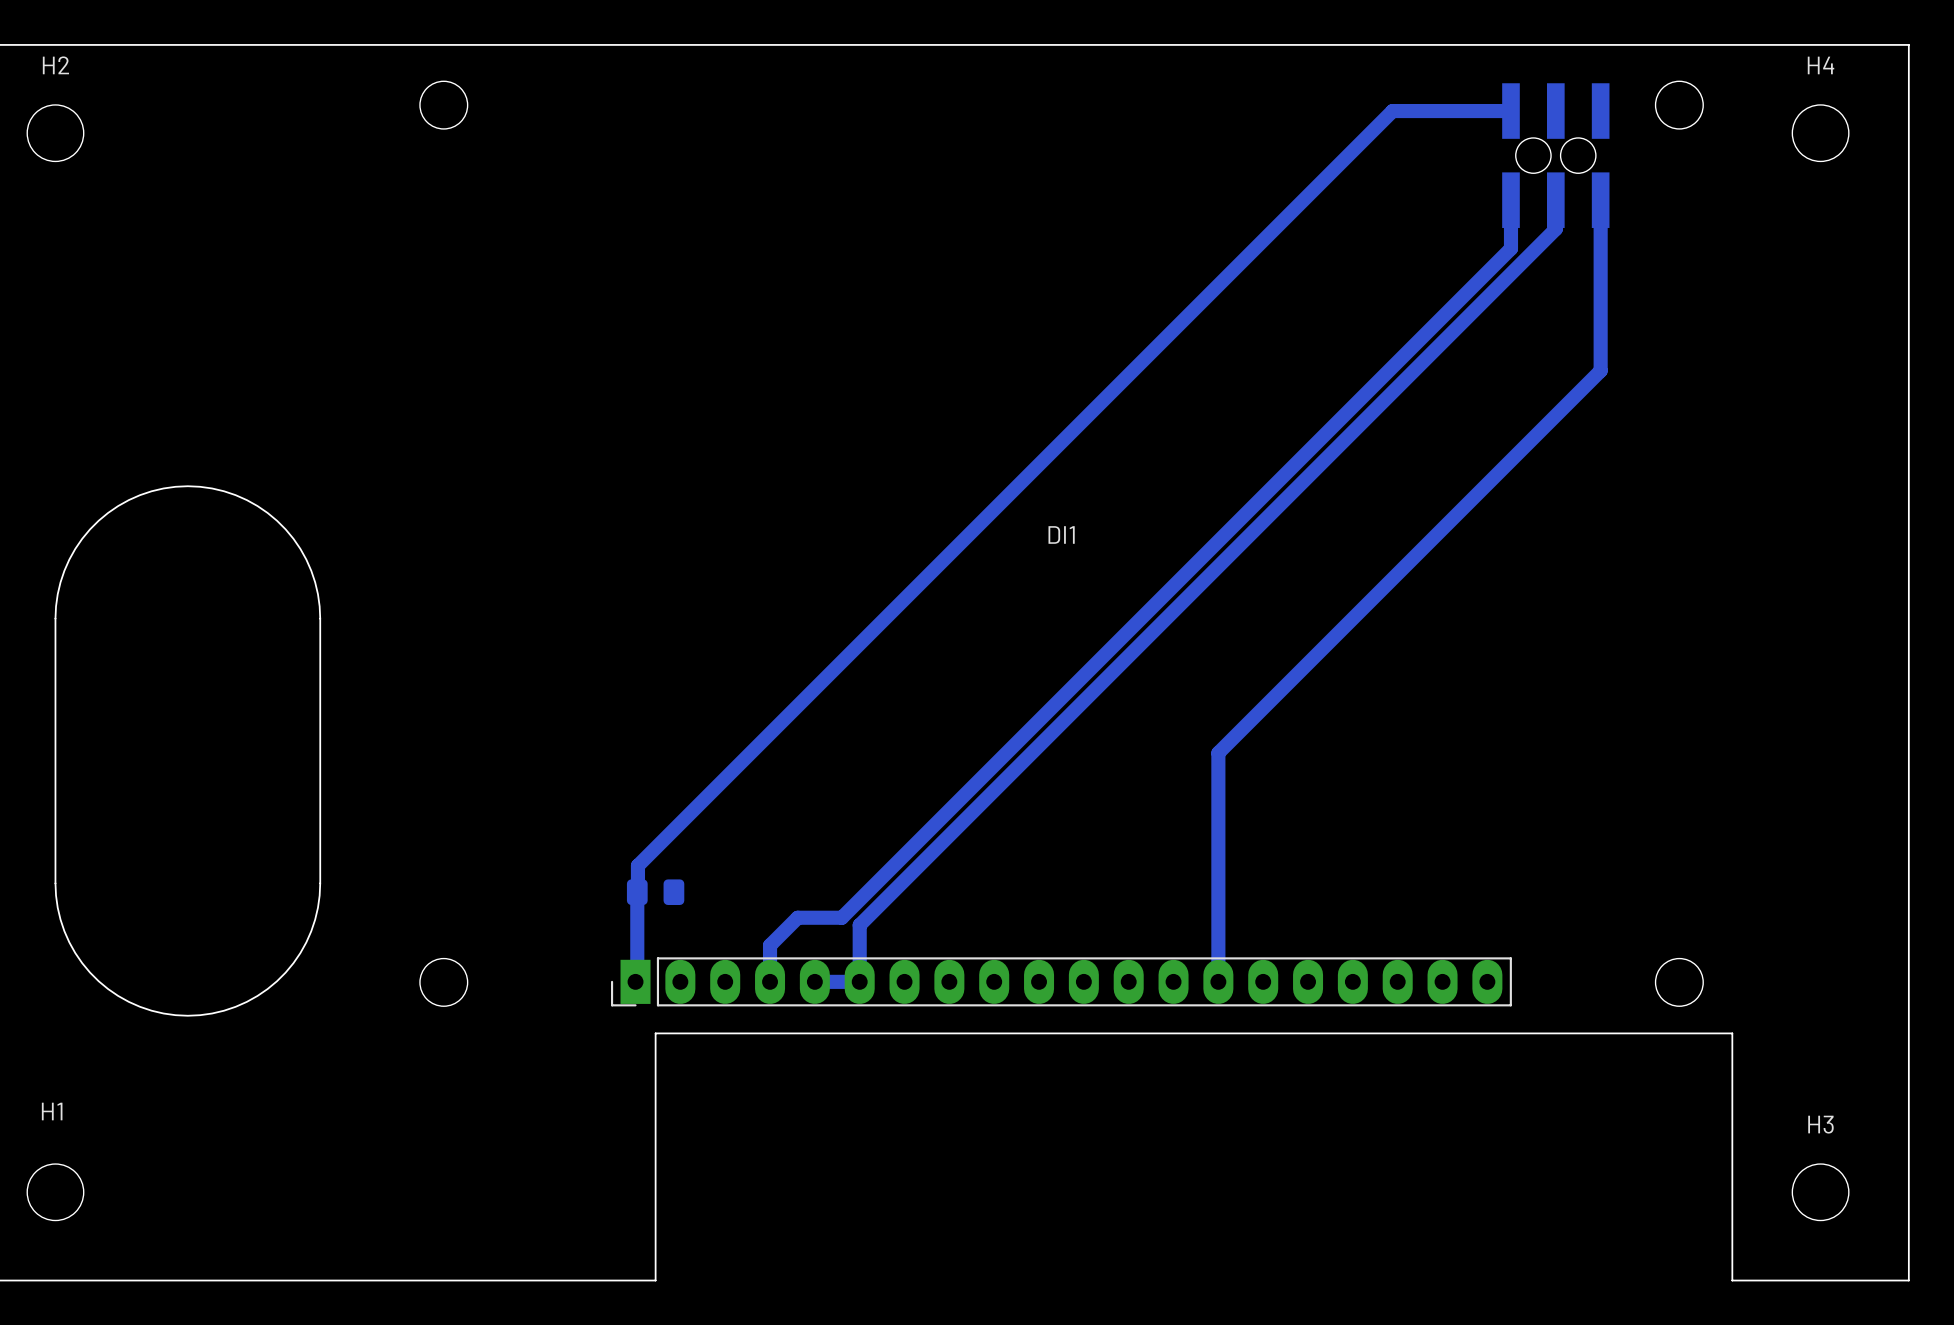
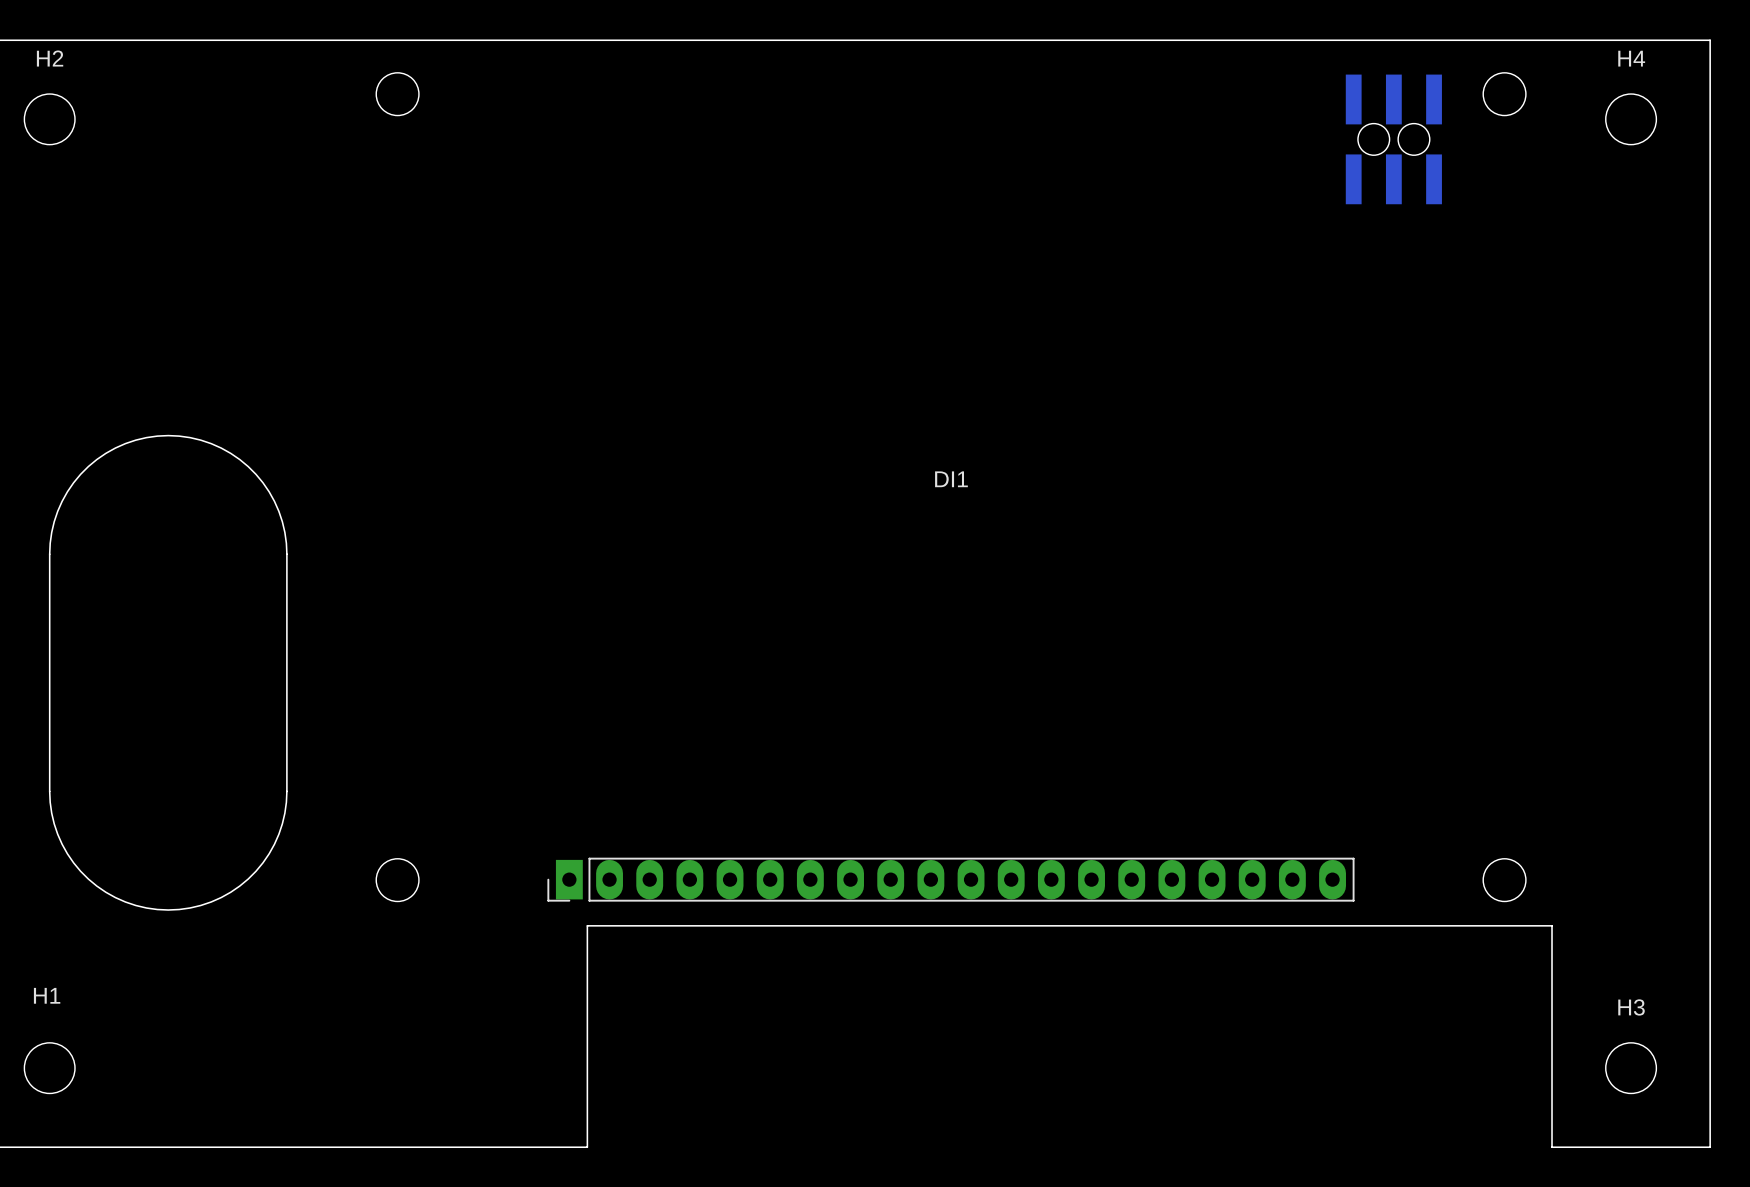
bottom track: (1510, 111) (1392, 111) (637, 865) (637, 980) (635, 981) -> none
bottom track: (1510, 200) (1510, 248) (841, 917) (797, 917) (770, 945) (770, 981) -> none
bottom track: (1555, 200) (1555, 229) (859, 925) (859, 981) (814, 981) -> none
bottom track: (1600, 200) (1600, 370) (1218, 753) (1218, 981) -> none
part: (655, 892) -> none

